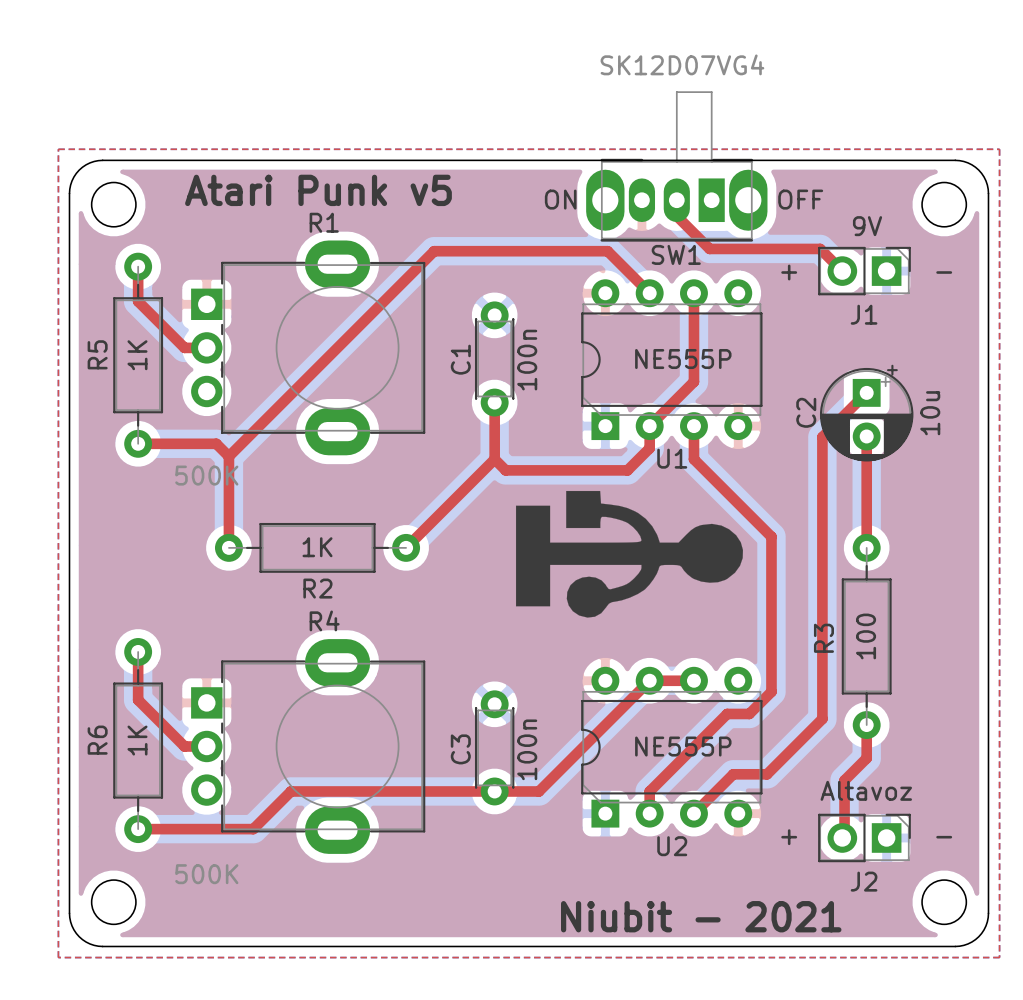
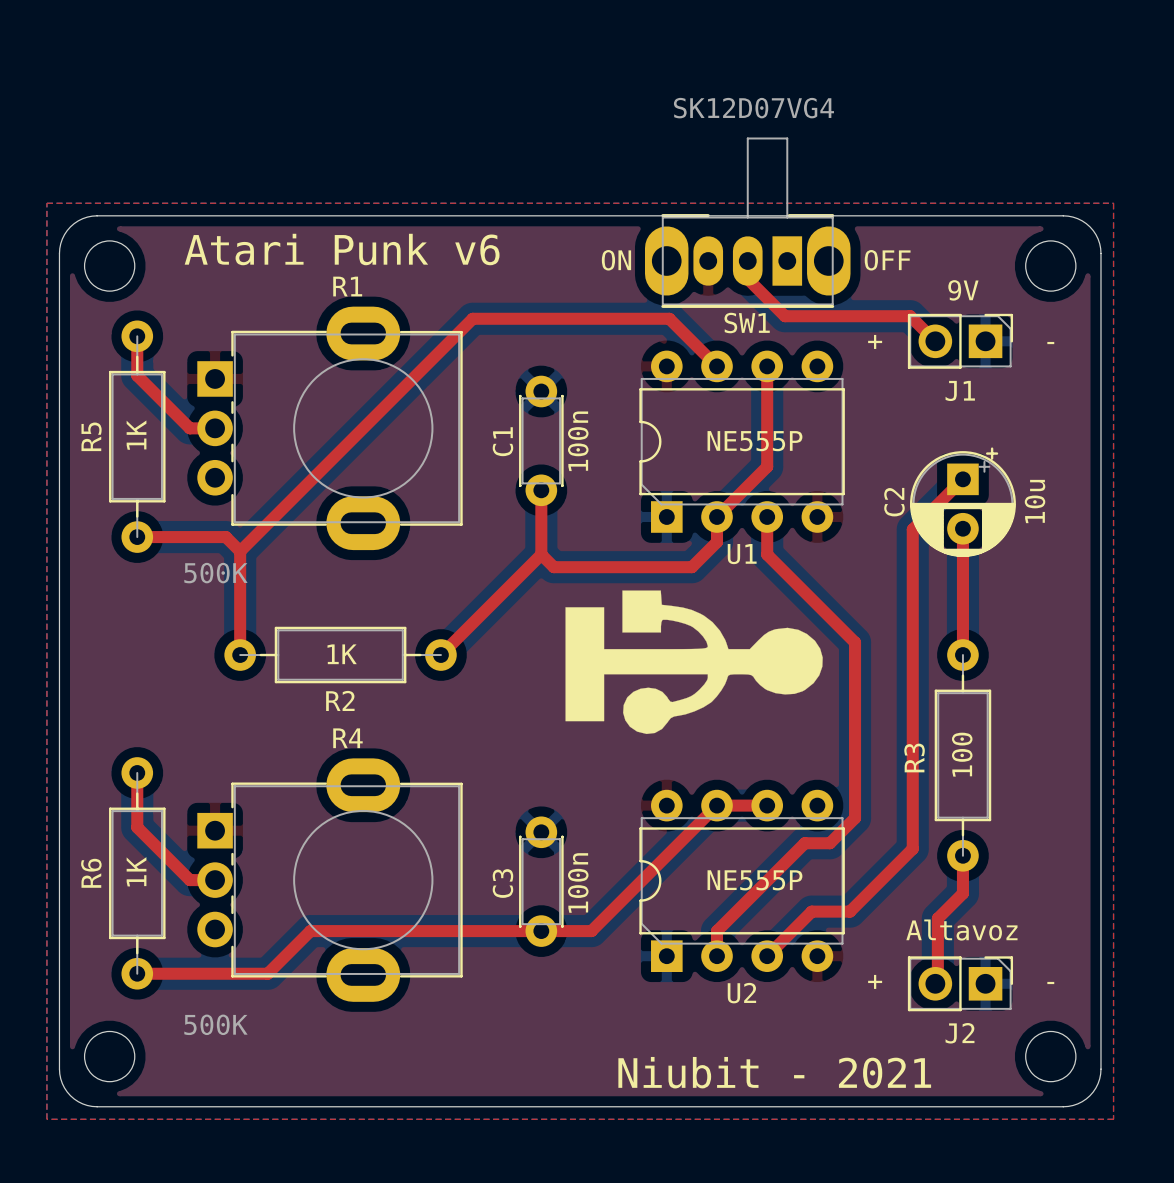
text: Atari Punk v5 (318, 190) -> Atari Punk v6 (342, 249)

